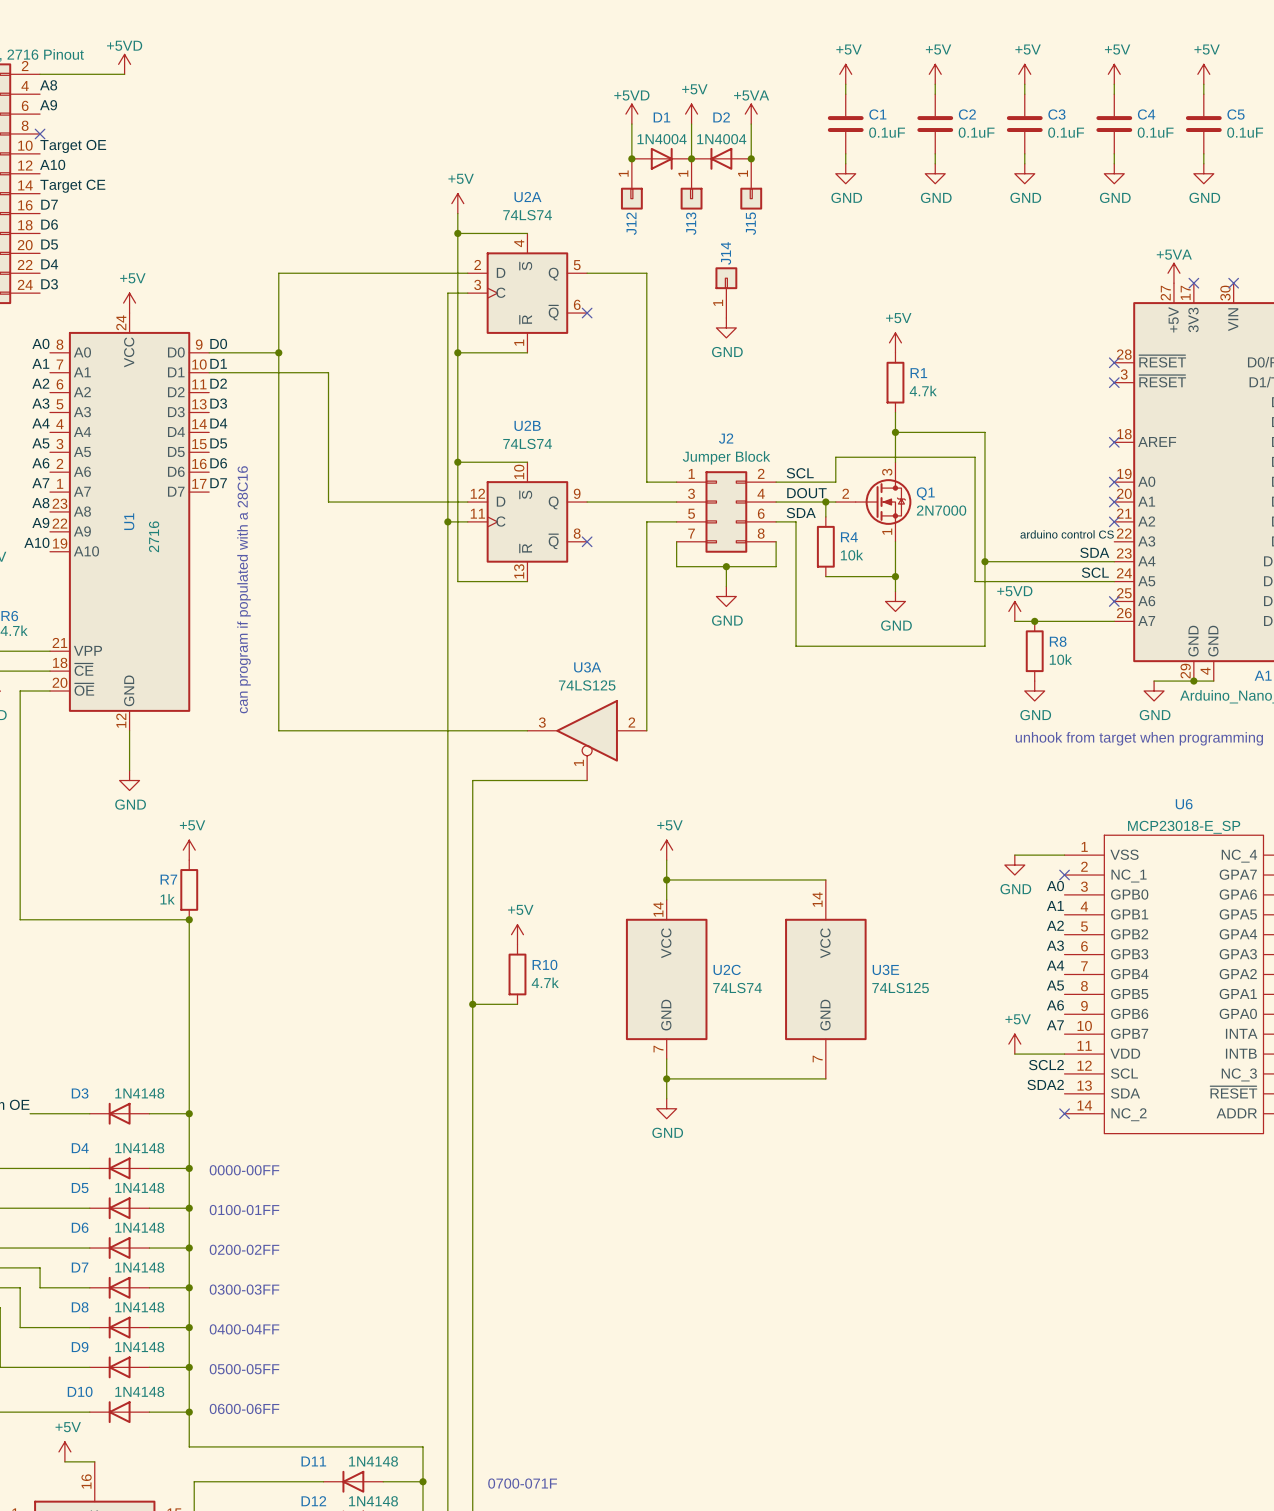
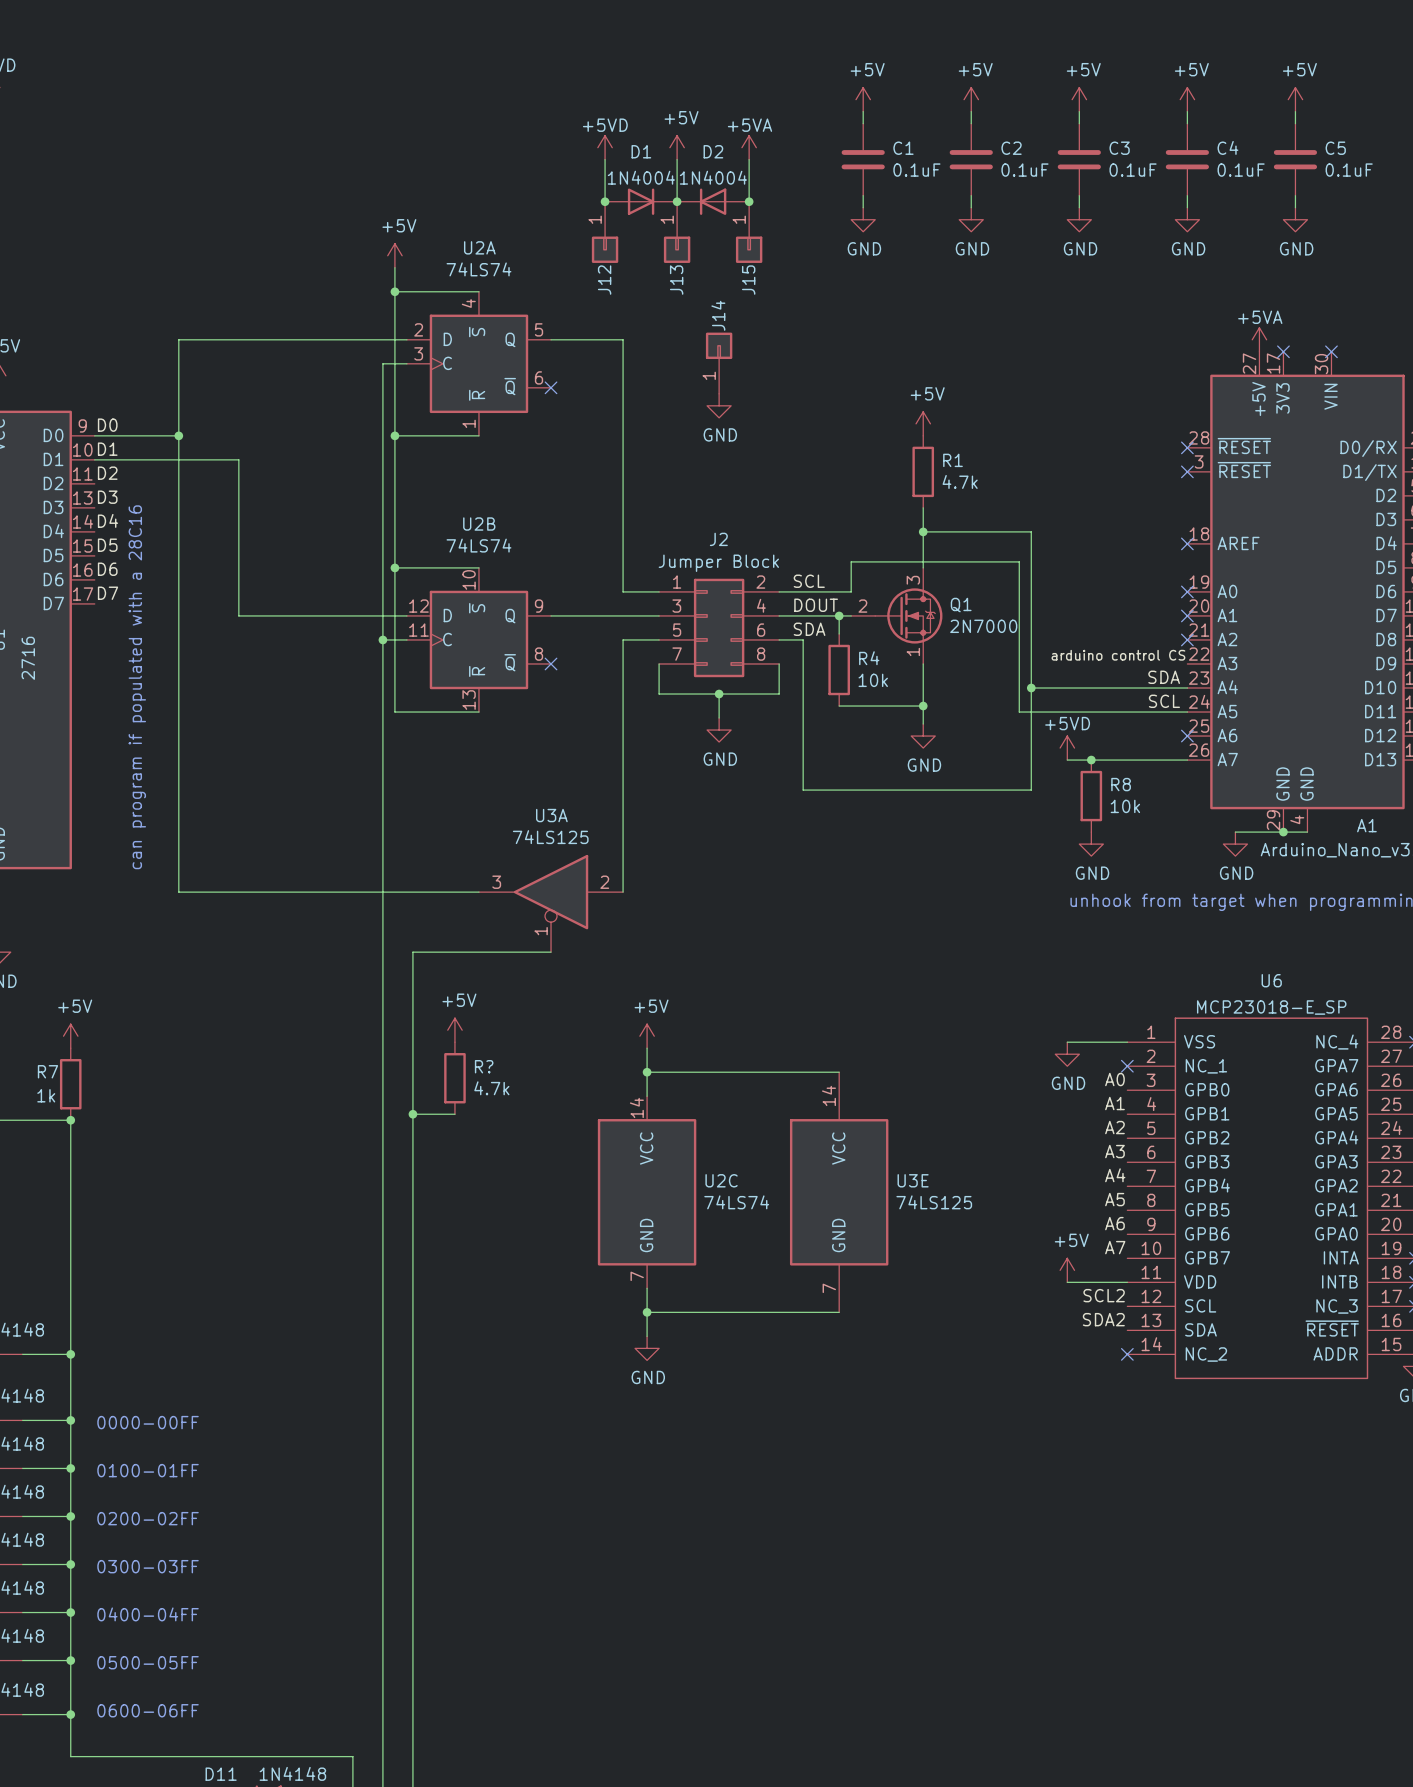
R?: none -> 4.7k (454, 1078)
wire: none -> (412, 1114) (454, 1114)
junction: none -> (412, 1114)
power symbol position: +5V (517, 934) -> +5V (454, 1030)
R10: 4.7k (517, 974) -> none
wire: (472, 1004) (517, 1004) -> none
junction: (472, 1004) -> none

